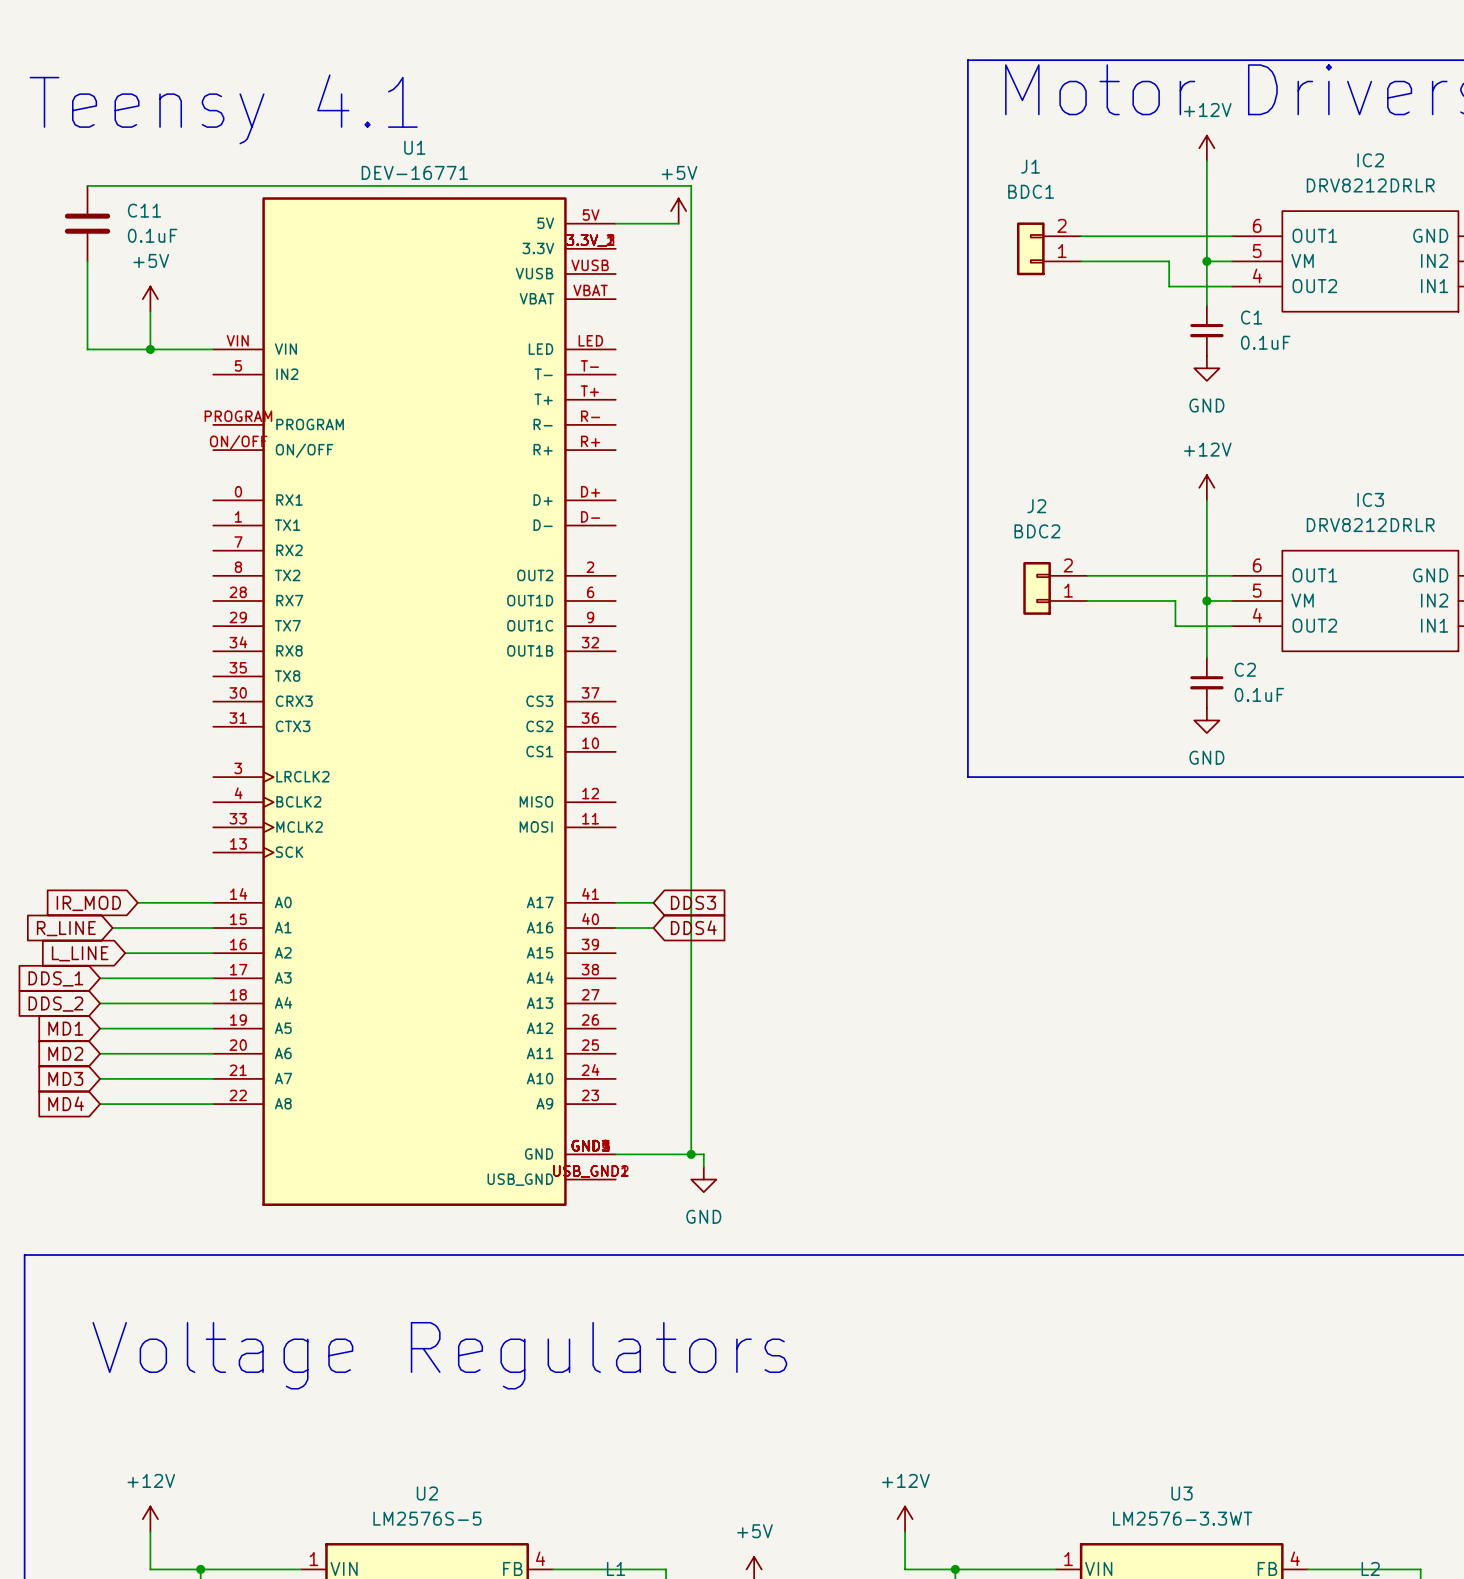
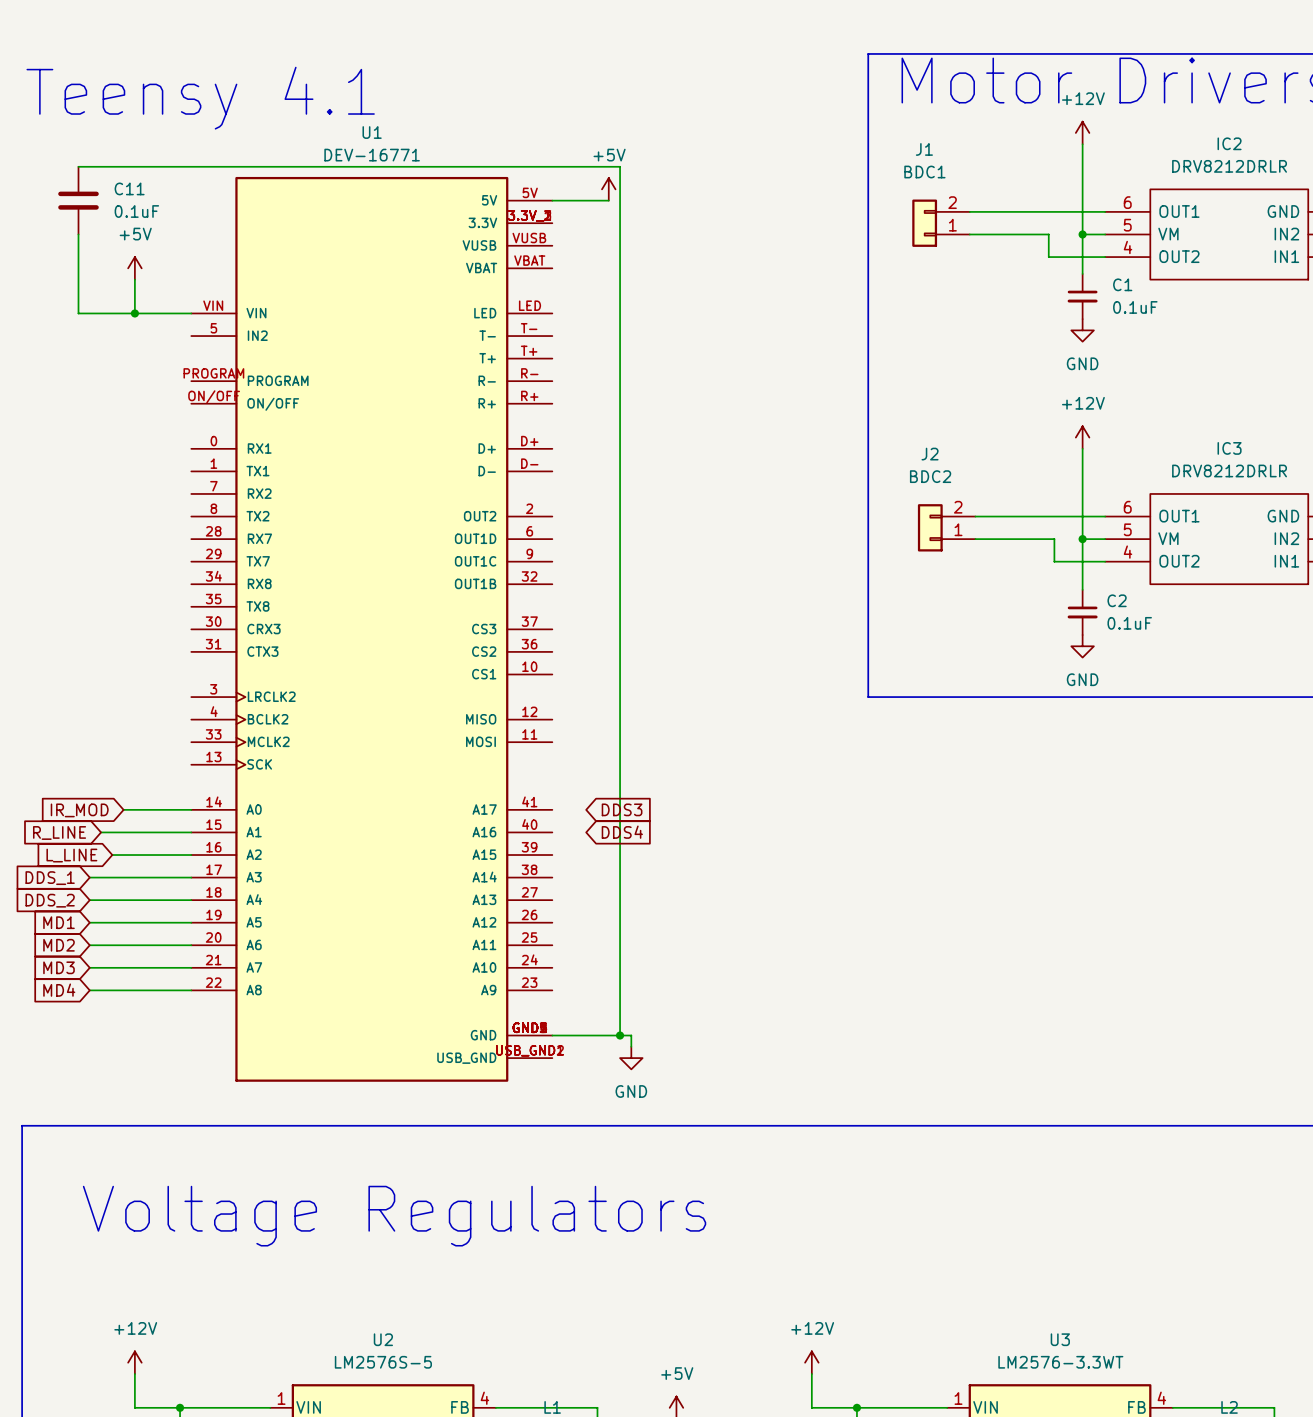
wire: (615, 902) (653, 902) -> none
wire: (615, 928) (653, 928) -> none

